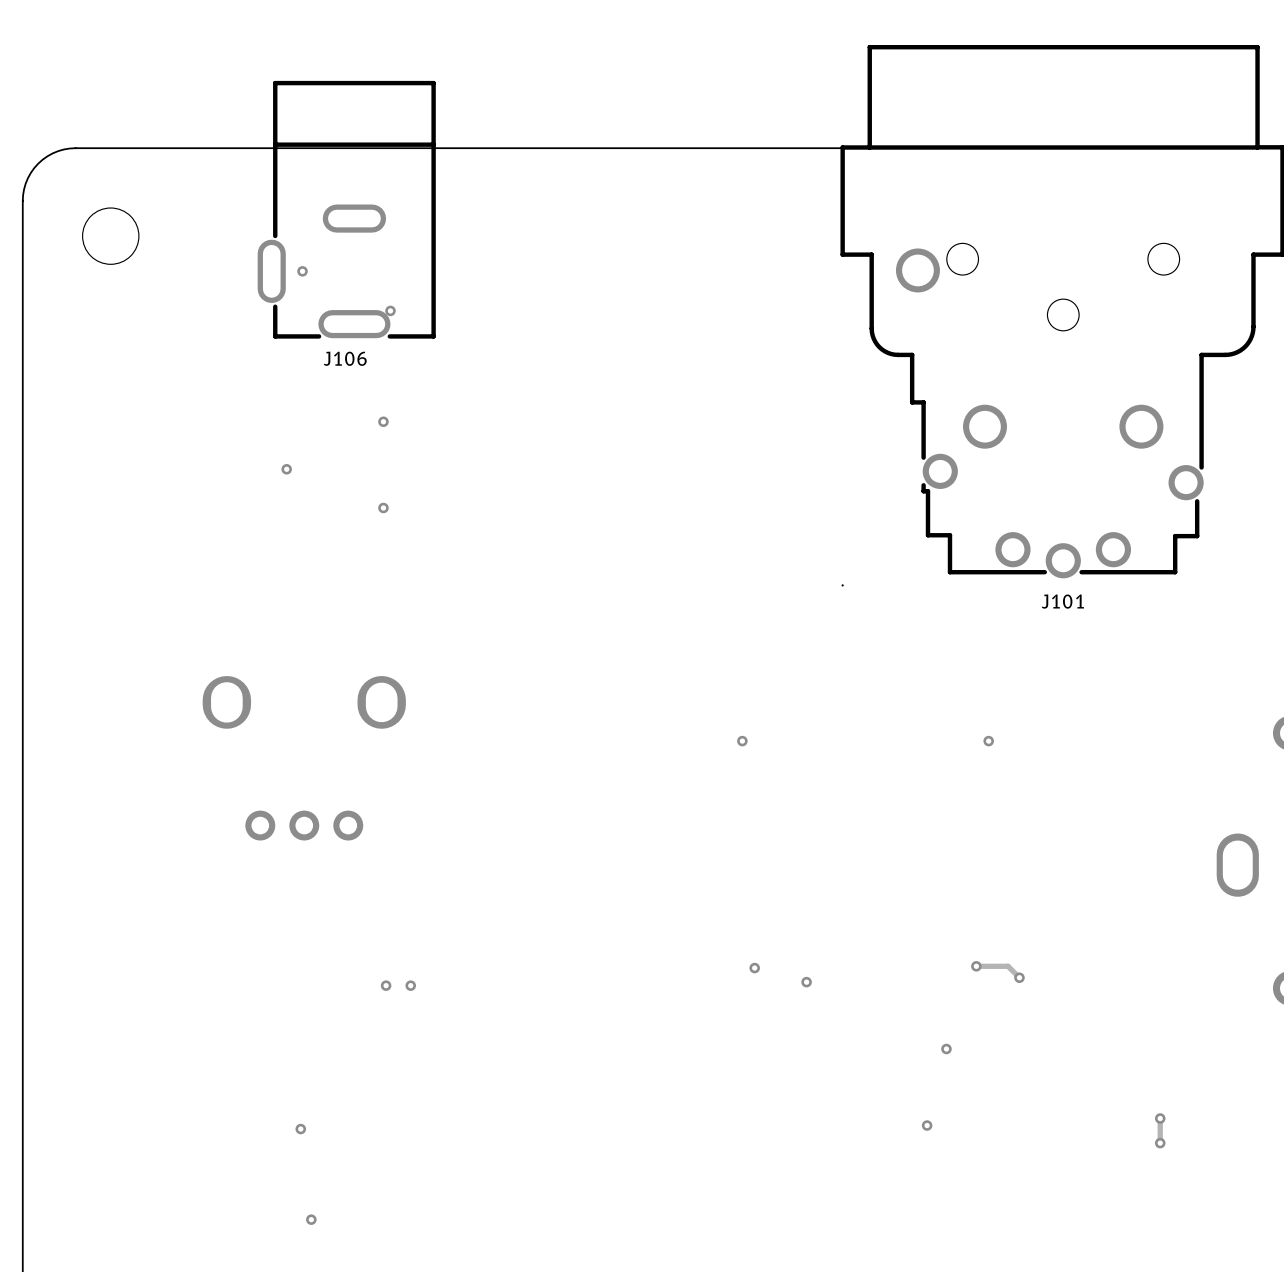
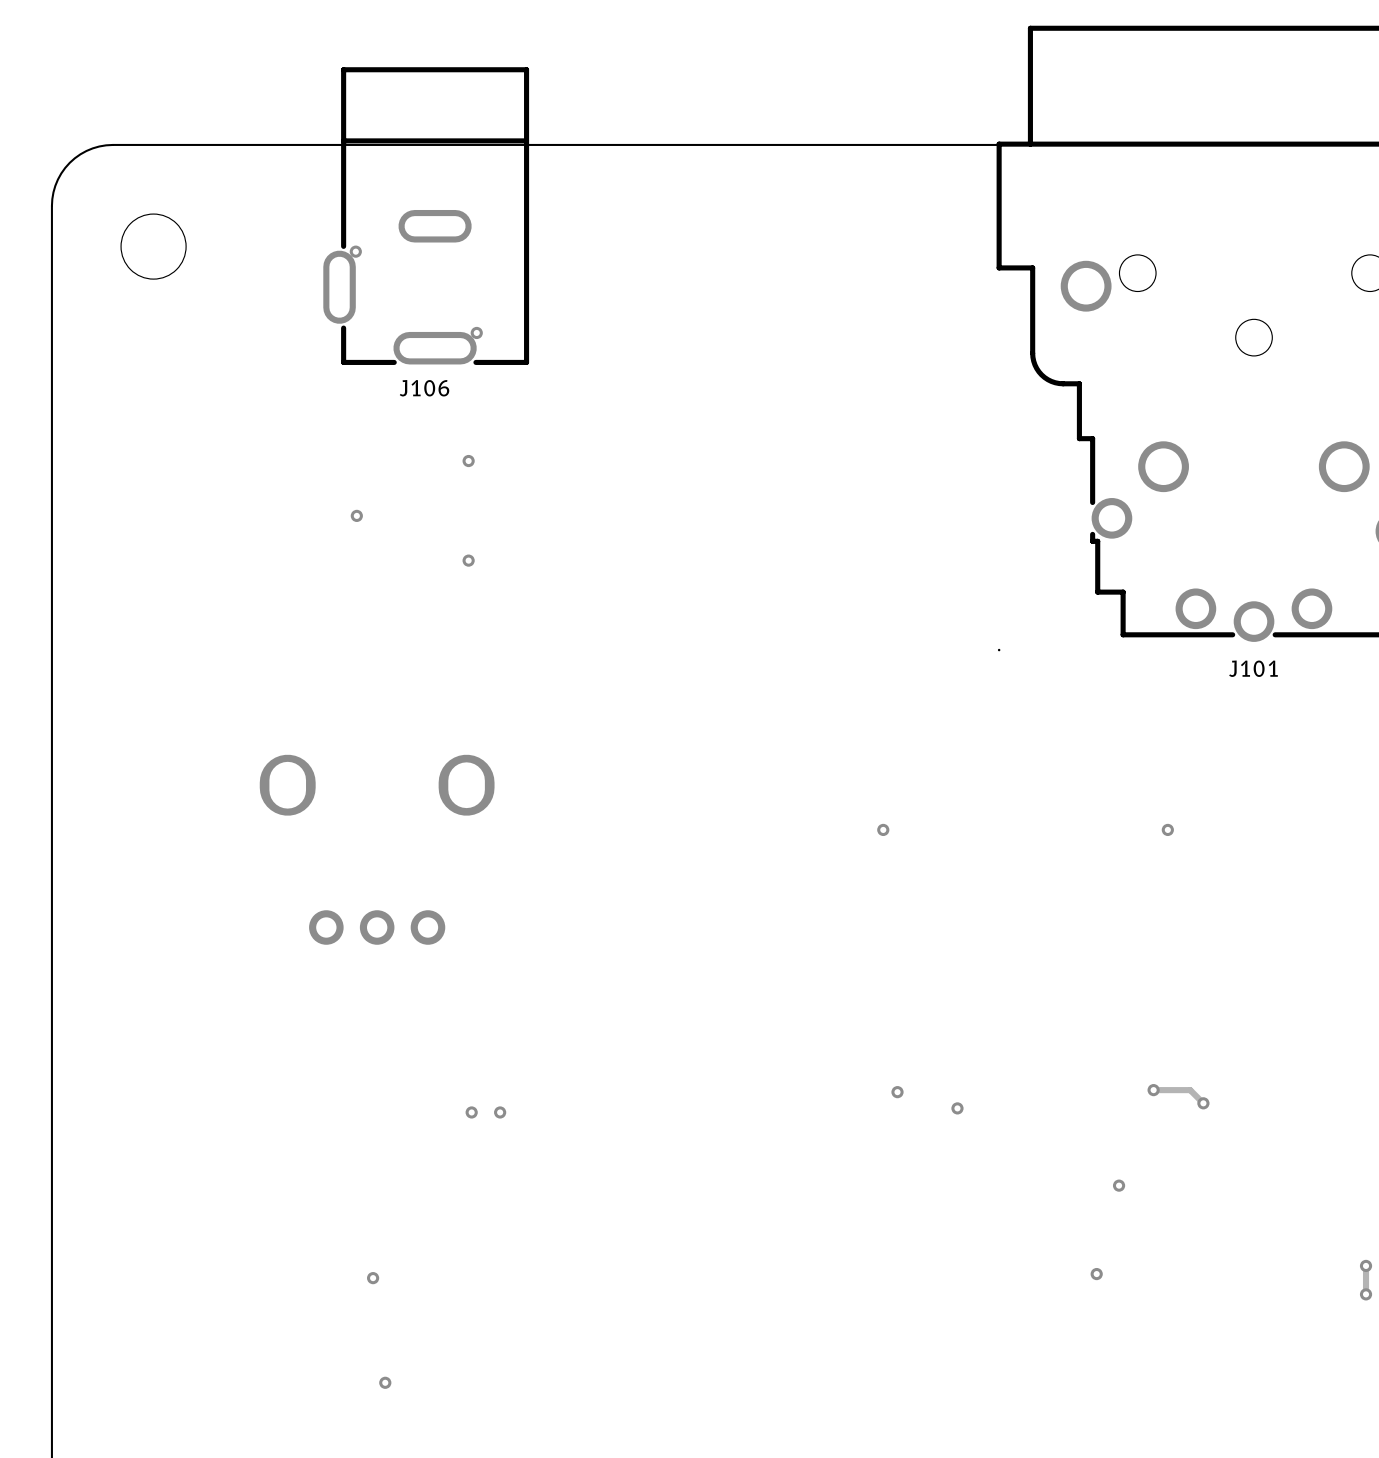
via position: (302, 271) -> (355, 251)

